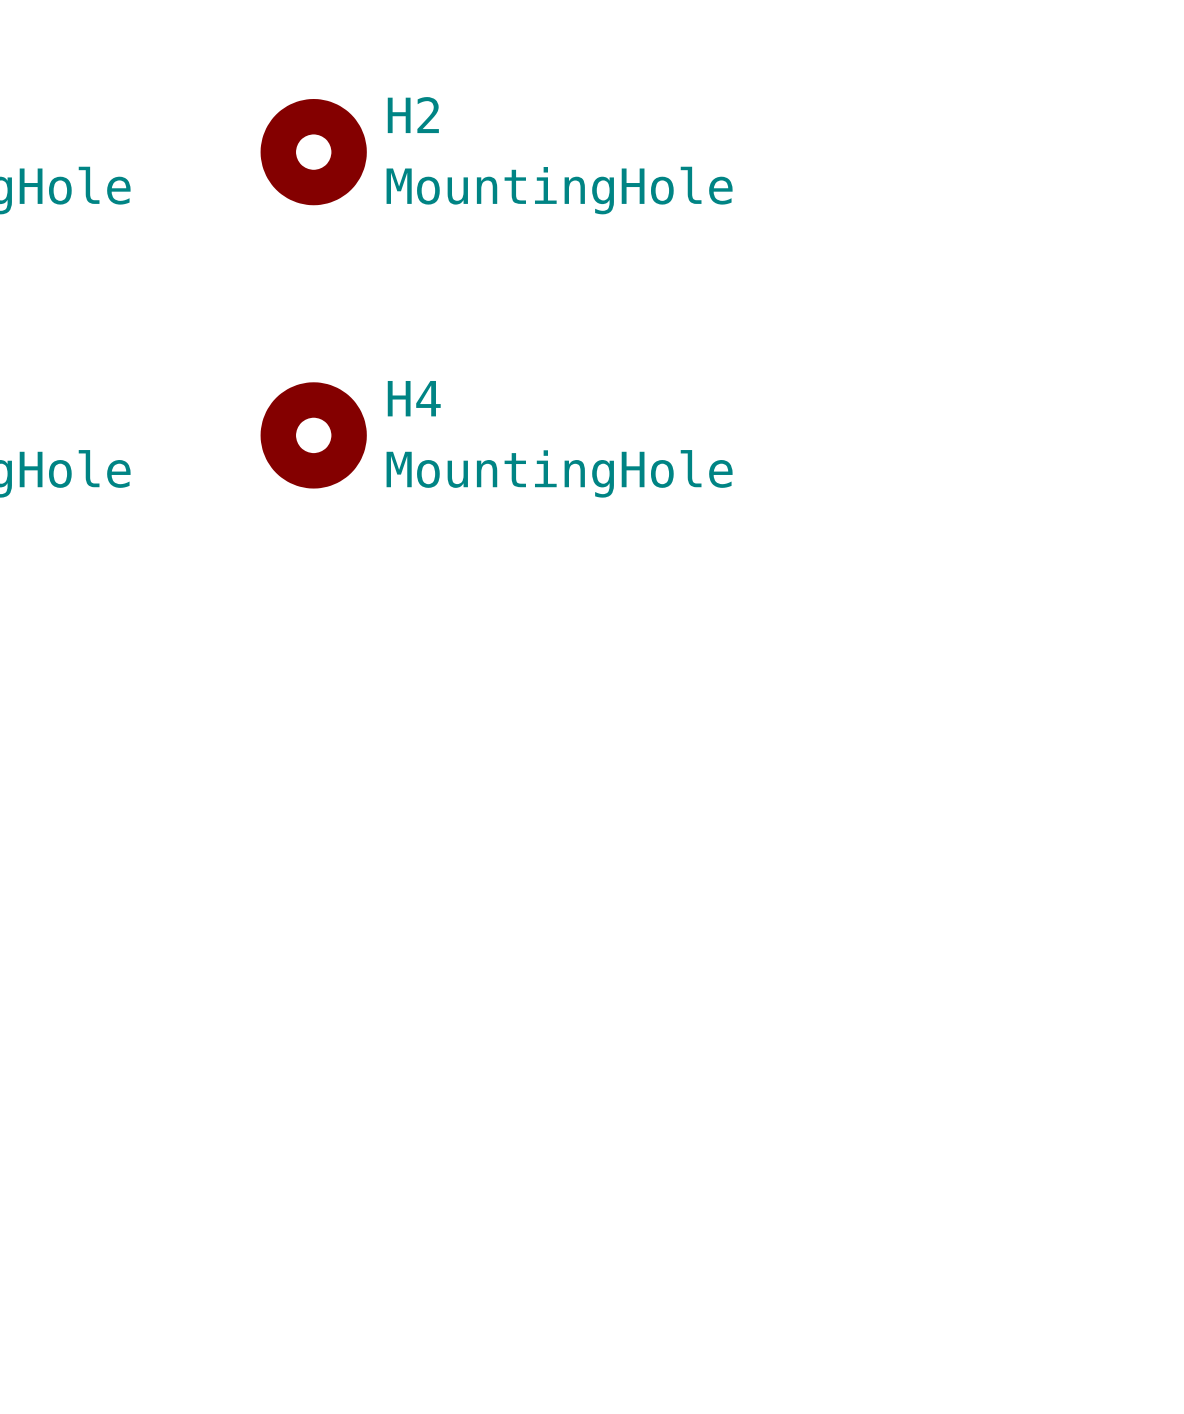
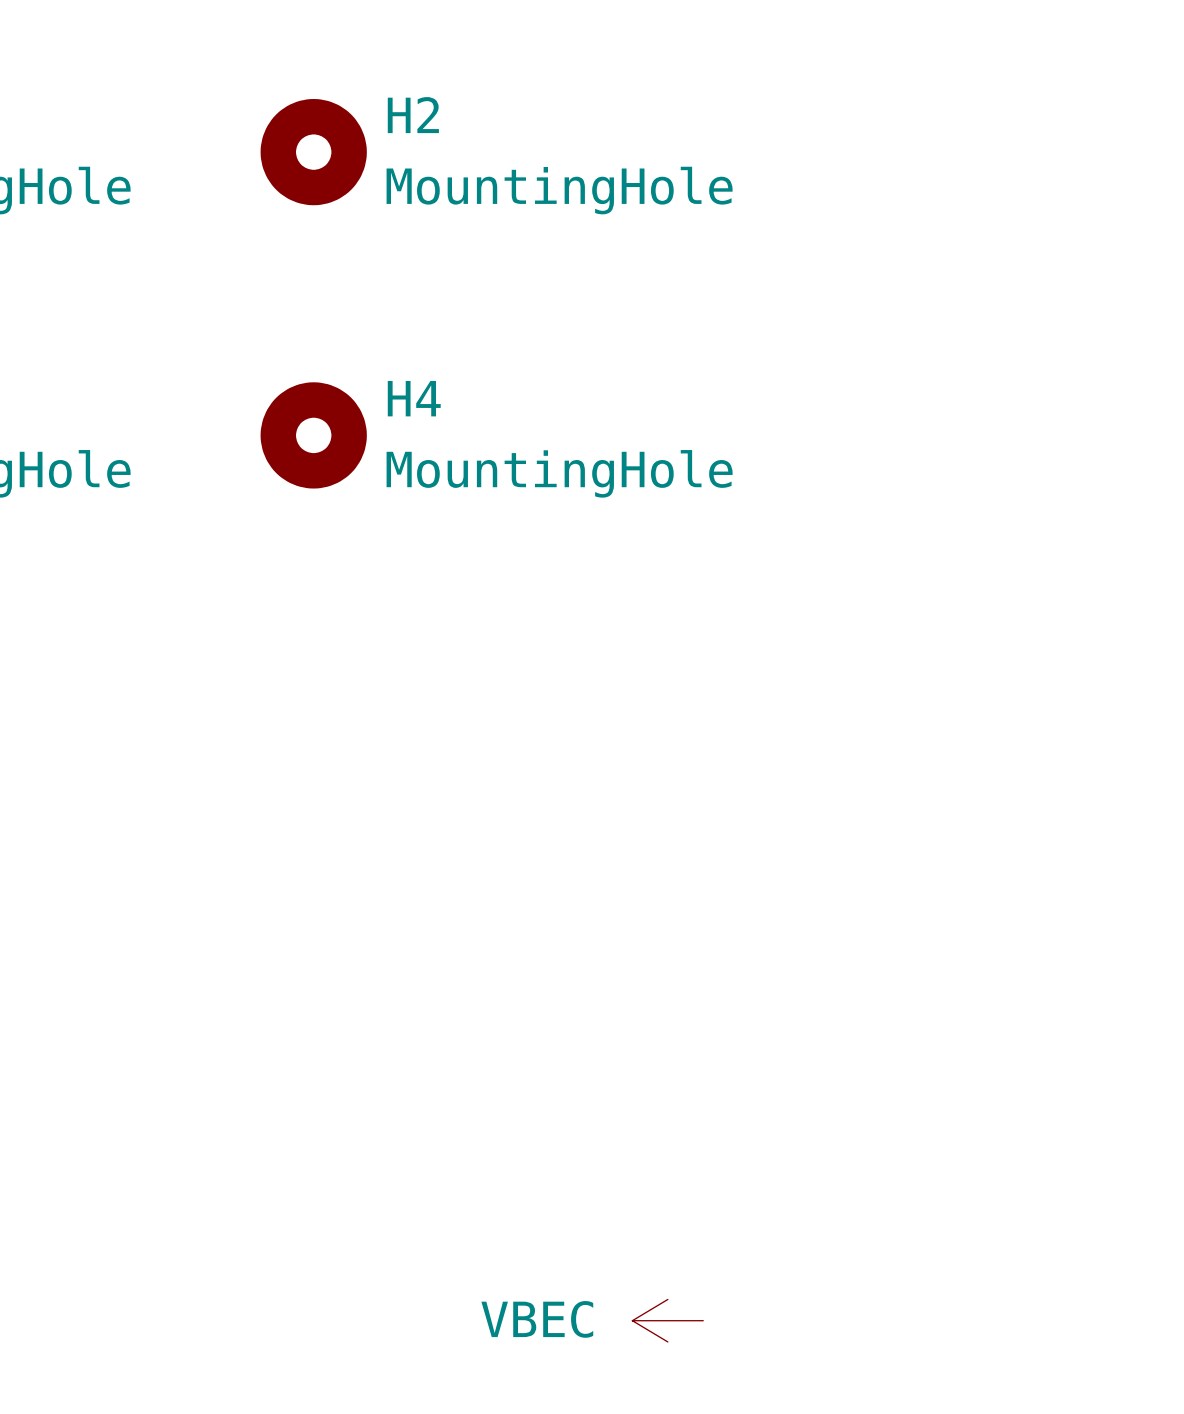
power symbol: none -> VBEC (667, 1320)

